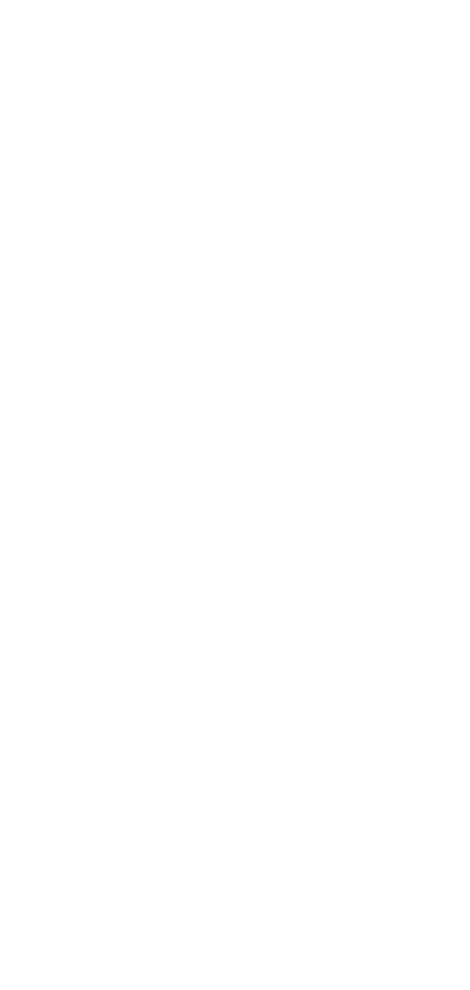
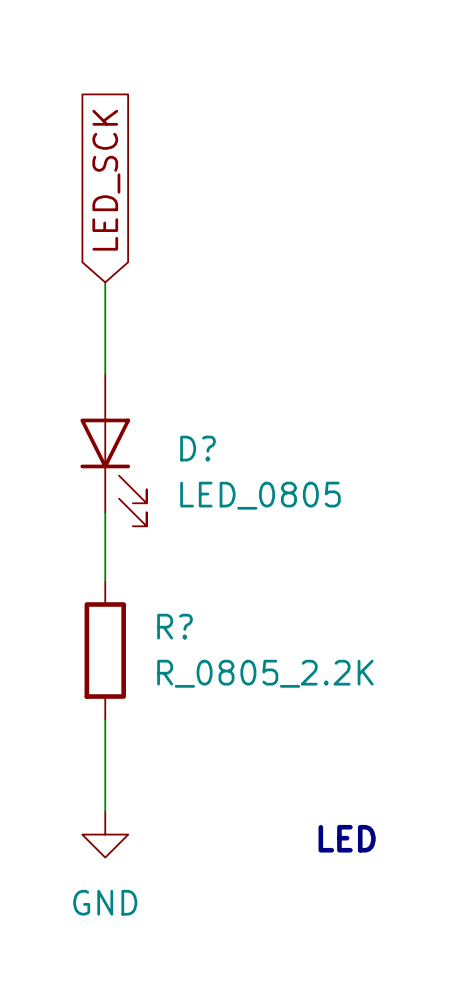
global label: none -> LED_SCK (106, 180)
wire: none -> (105, 282) (105, 374)
D?: none -> LED_0805 (113, 450)
wire: none -> (105, 512) (105, 581)
R?: none -> R_0805_2.2K (105, 650)
wire: none -> (105, 719) (105, 811)
power symbol: none -> GND (105, 834)
text: none -> LED (347, 838)

